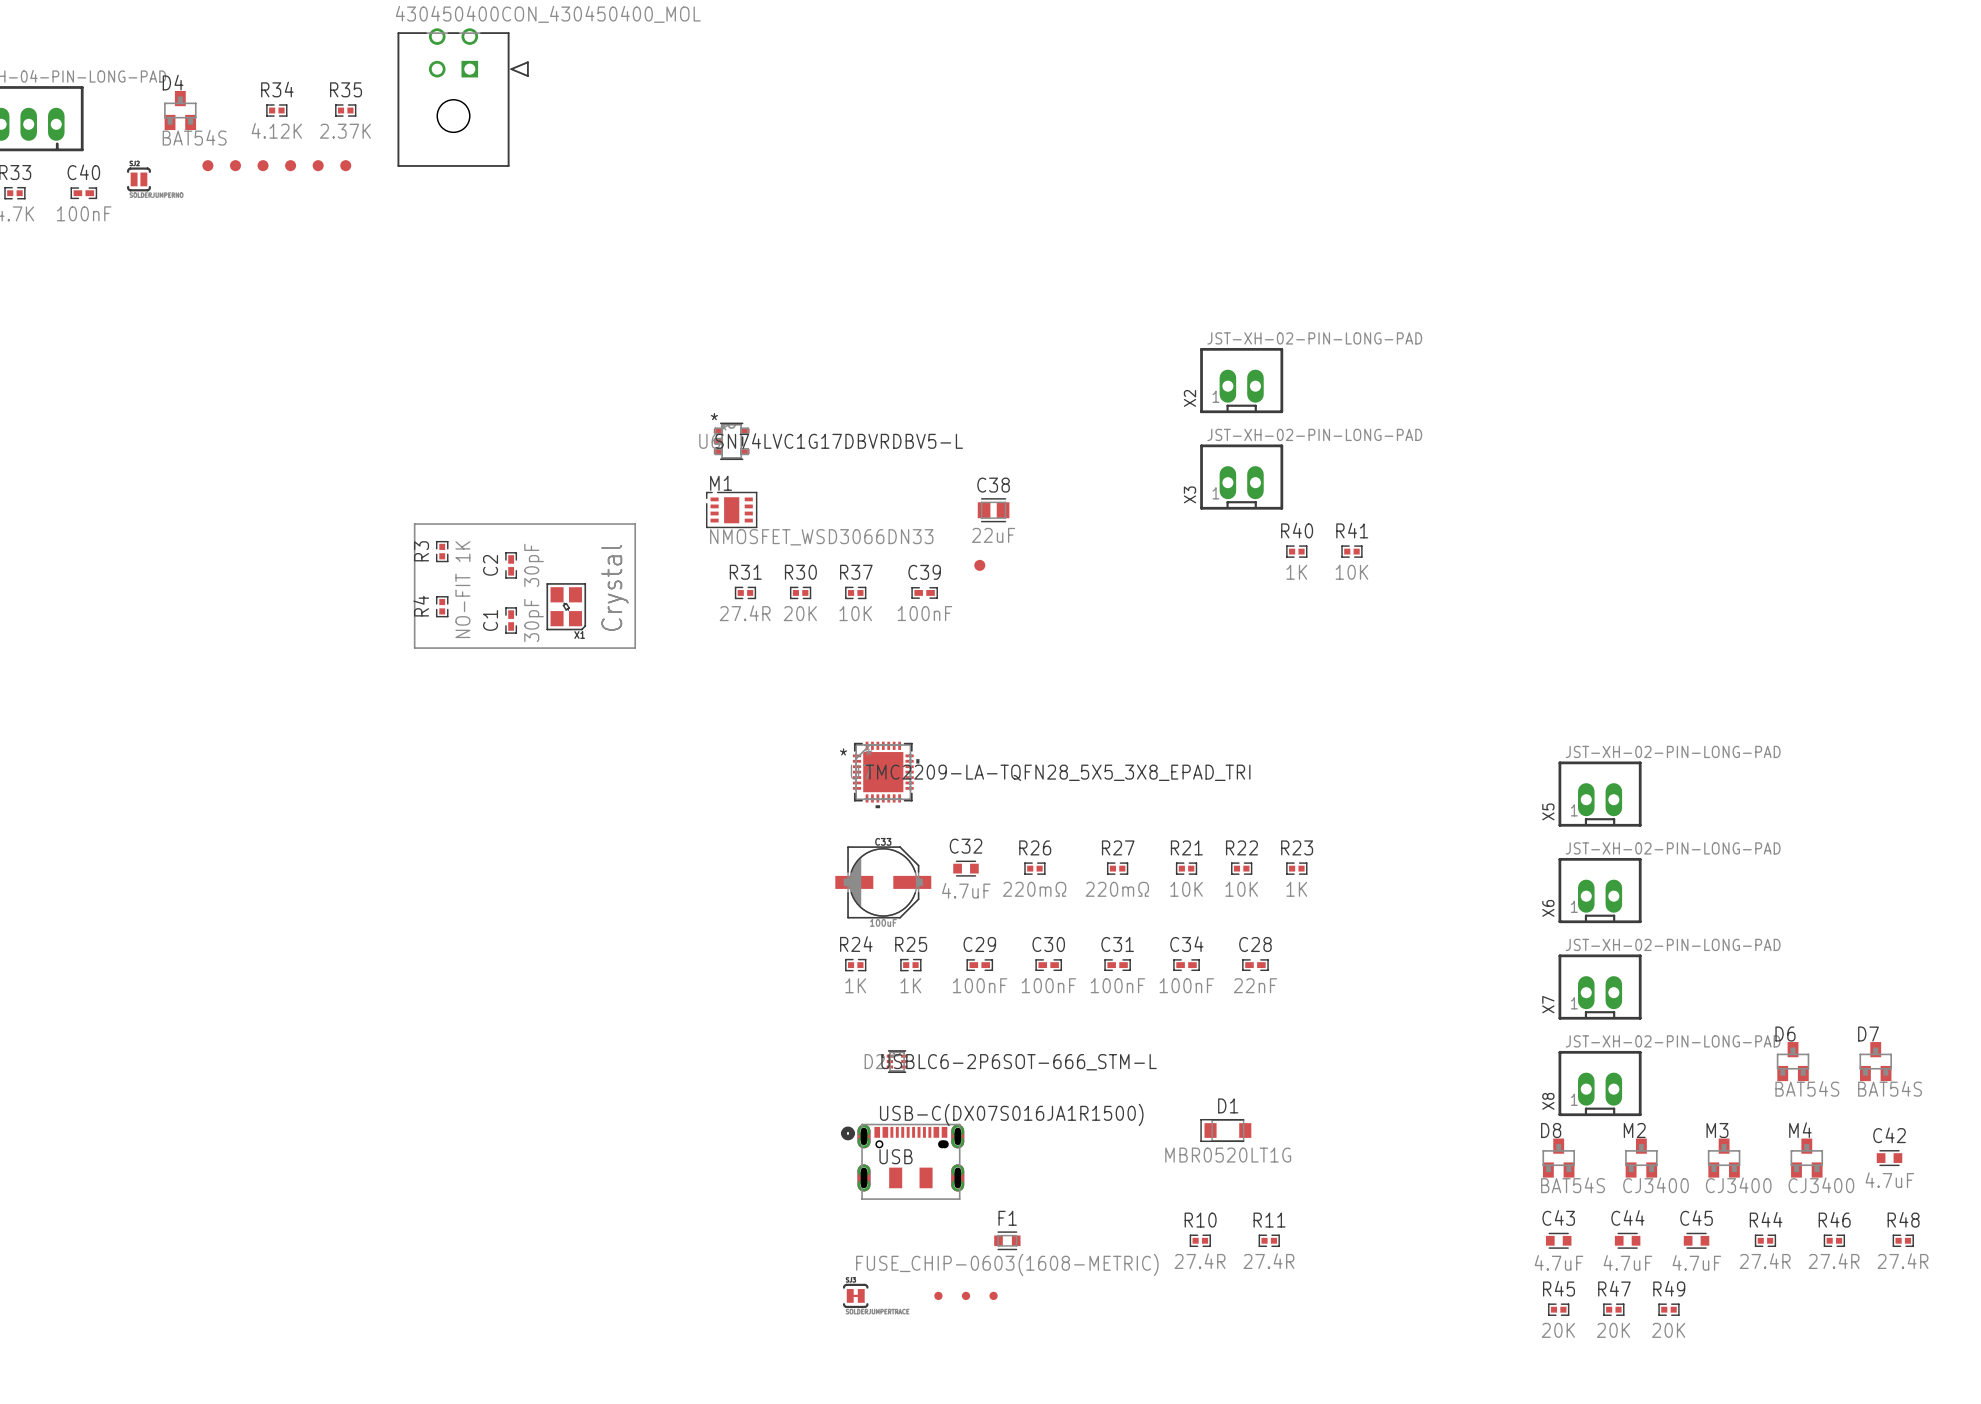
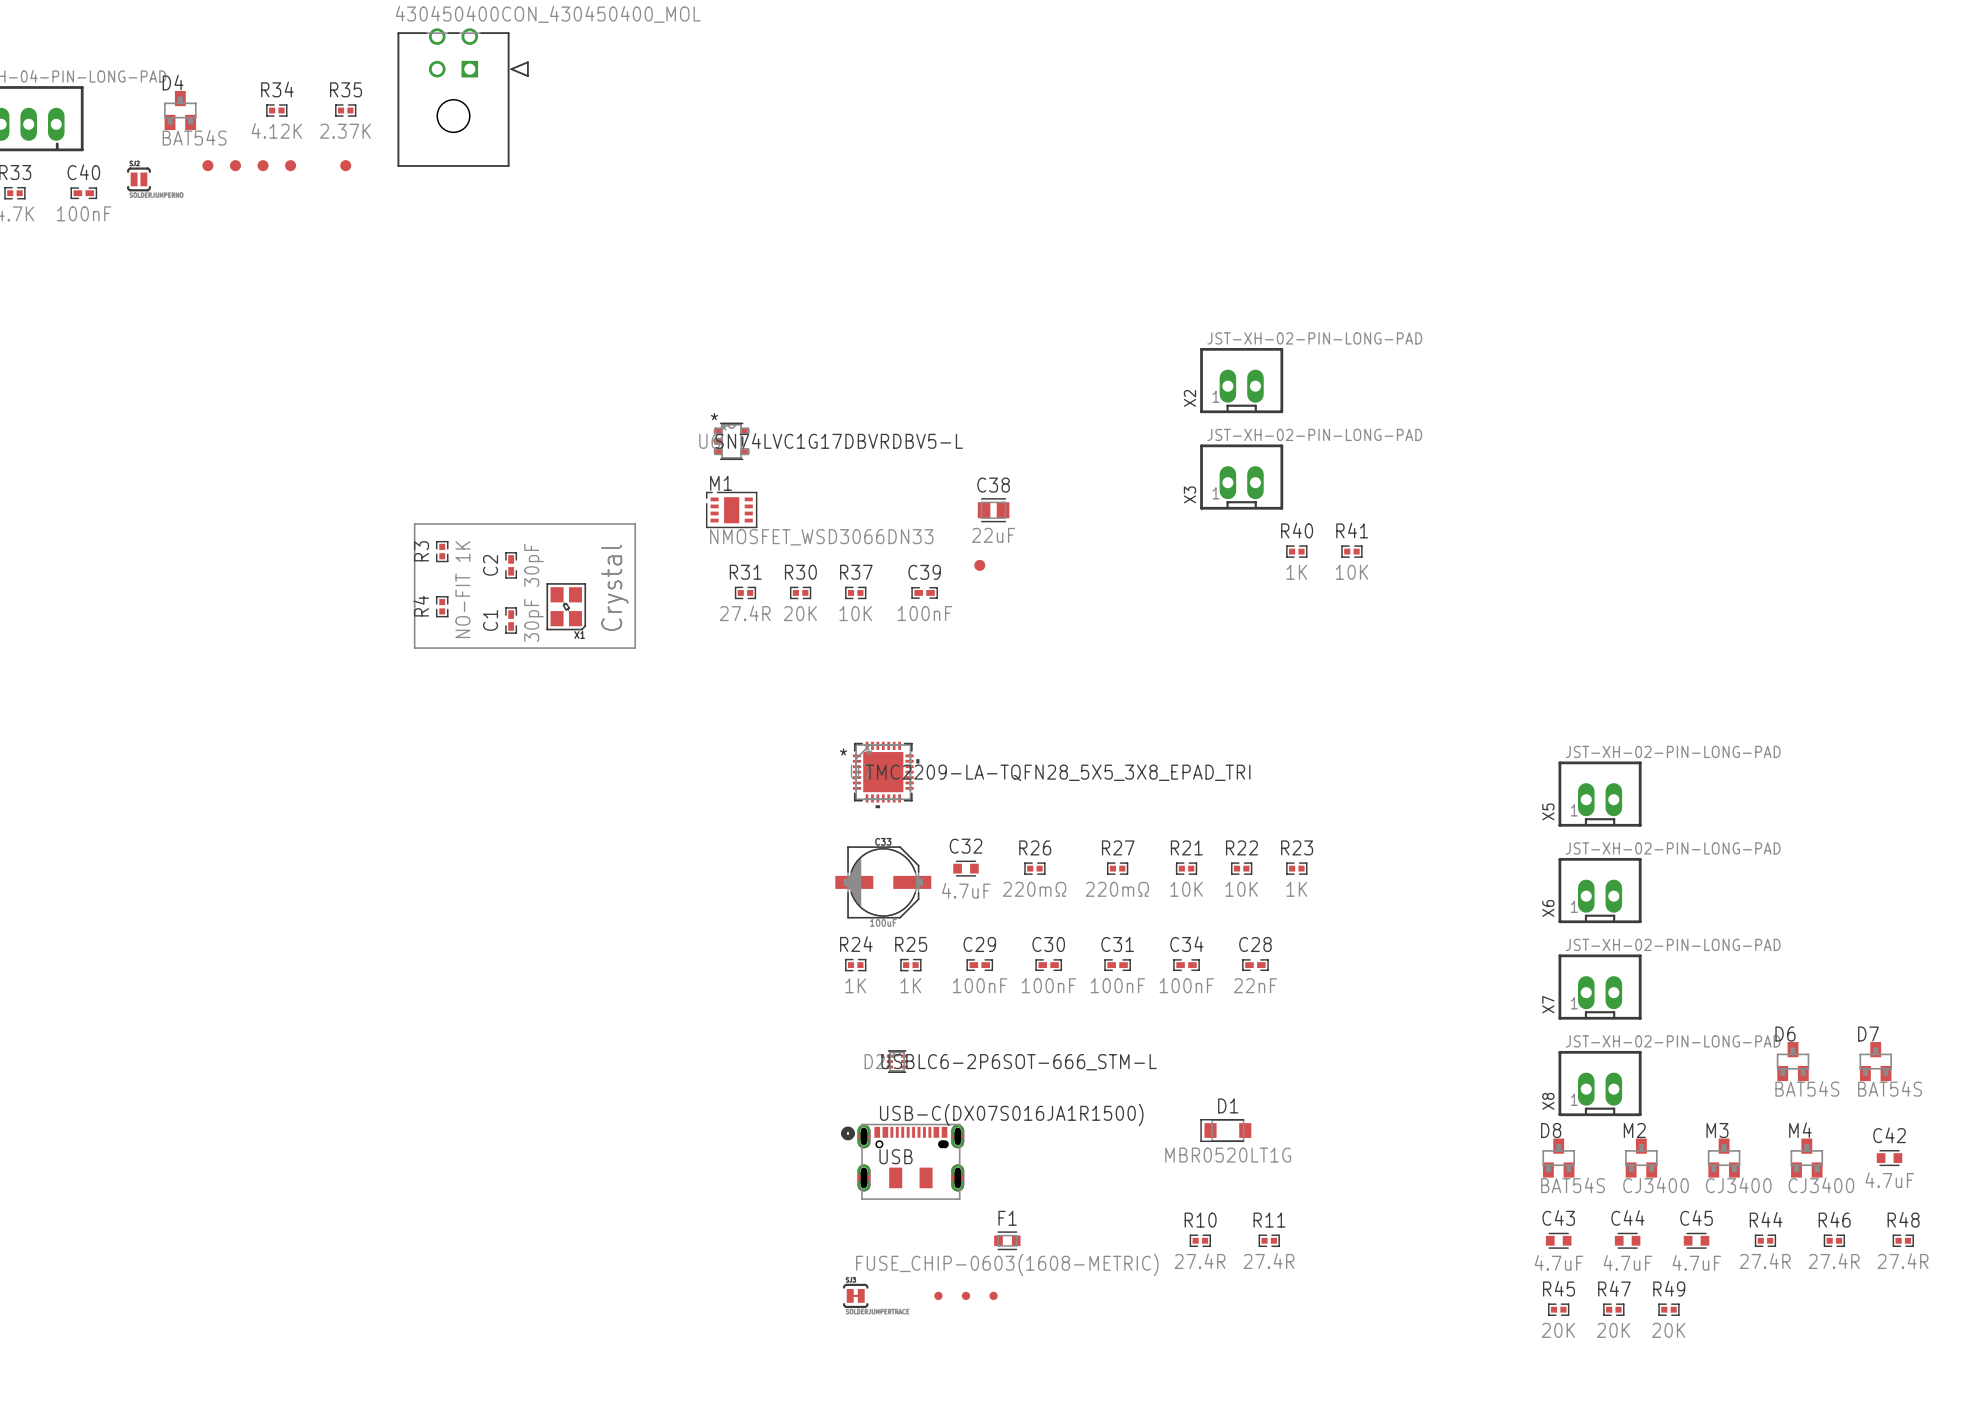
part: (318, 165) -> none

